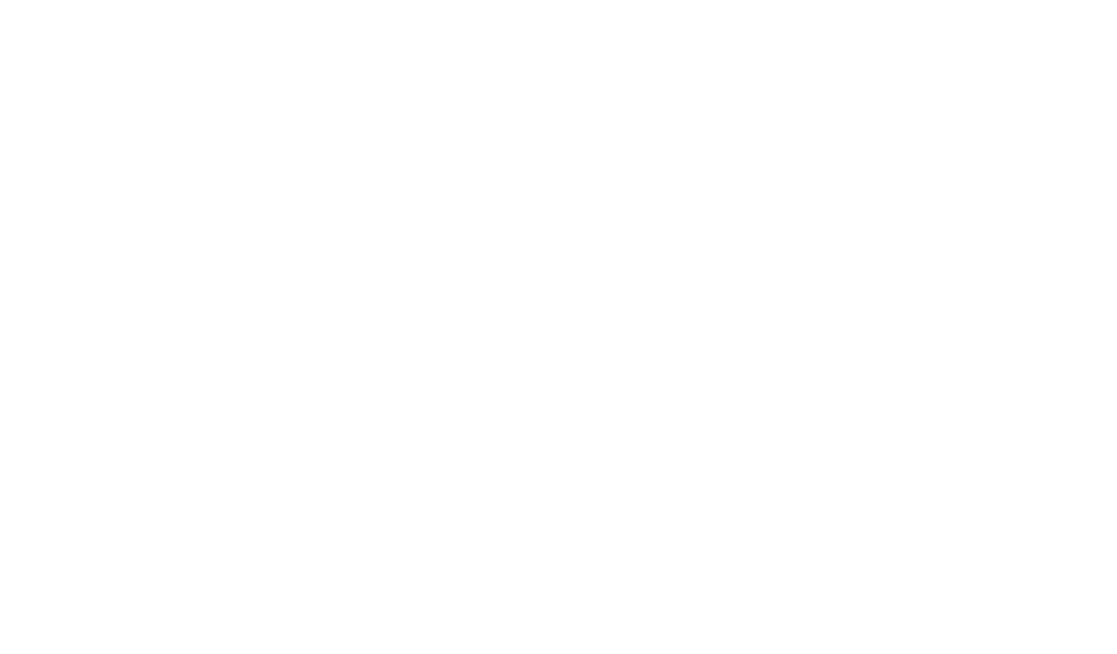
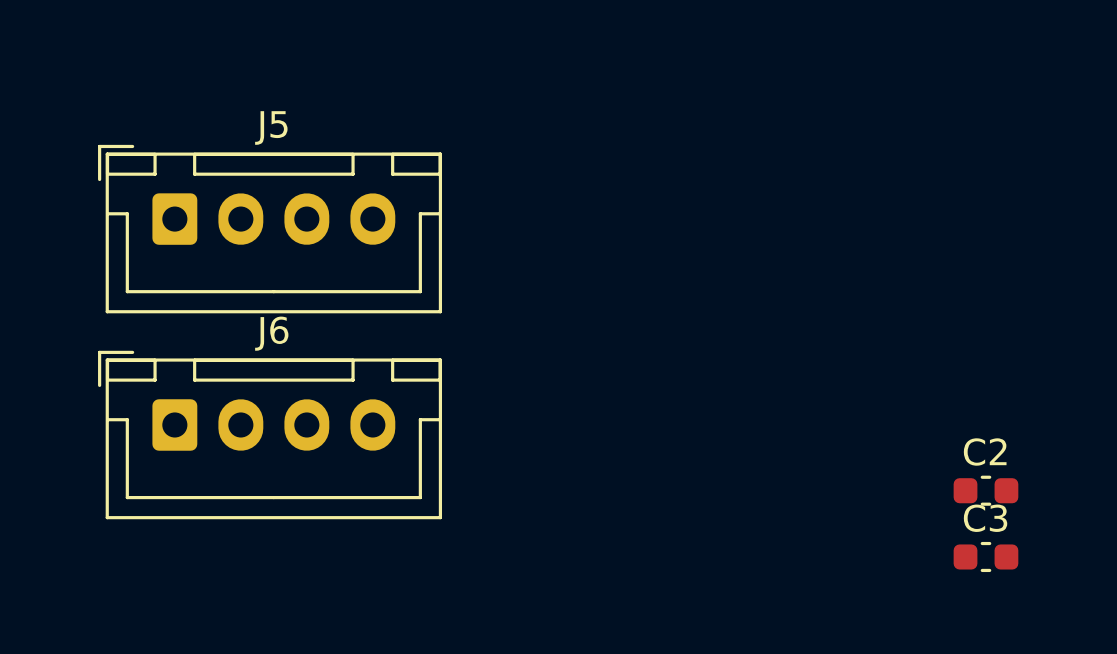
J5: none -> (270, 229)
J6: none -> (270, 435)
C2: none -> (985, 490)
C3: none -> (985, 556)

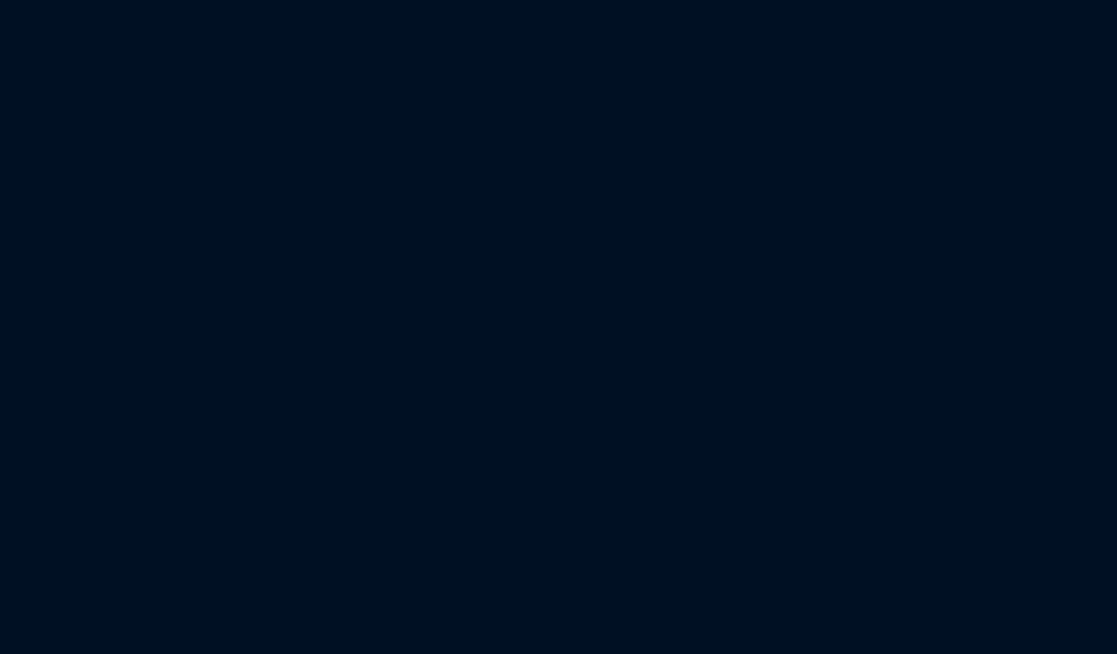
J5: (270, 229) -> none
J6: (270, 435) -> none
C2: (985, 490) -> none
C3: (985, 556) -> none

